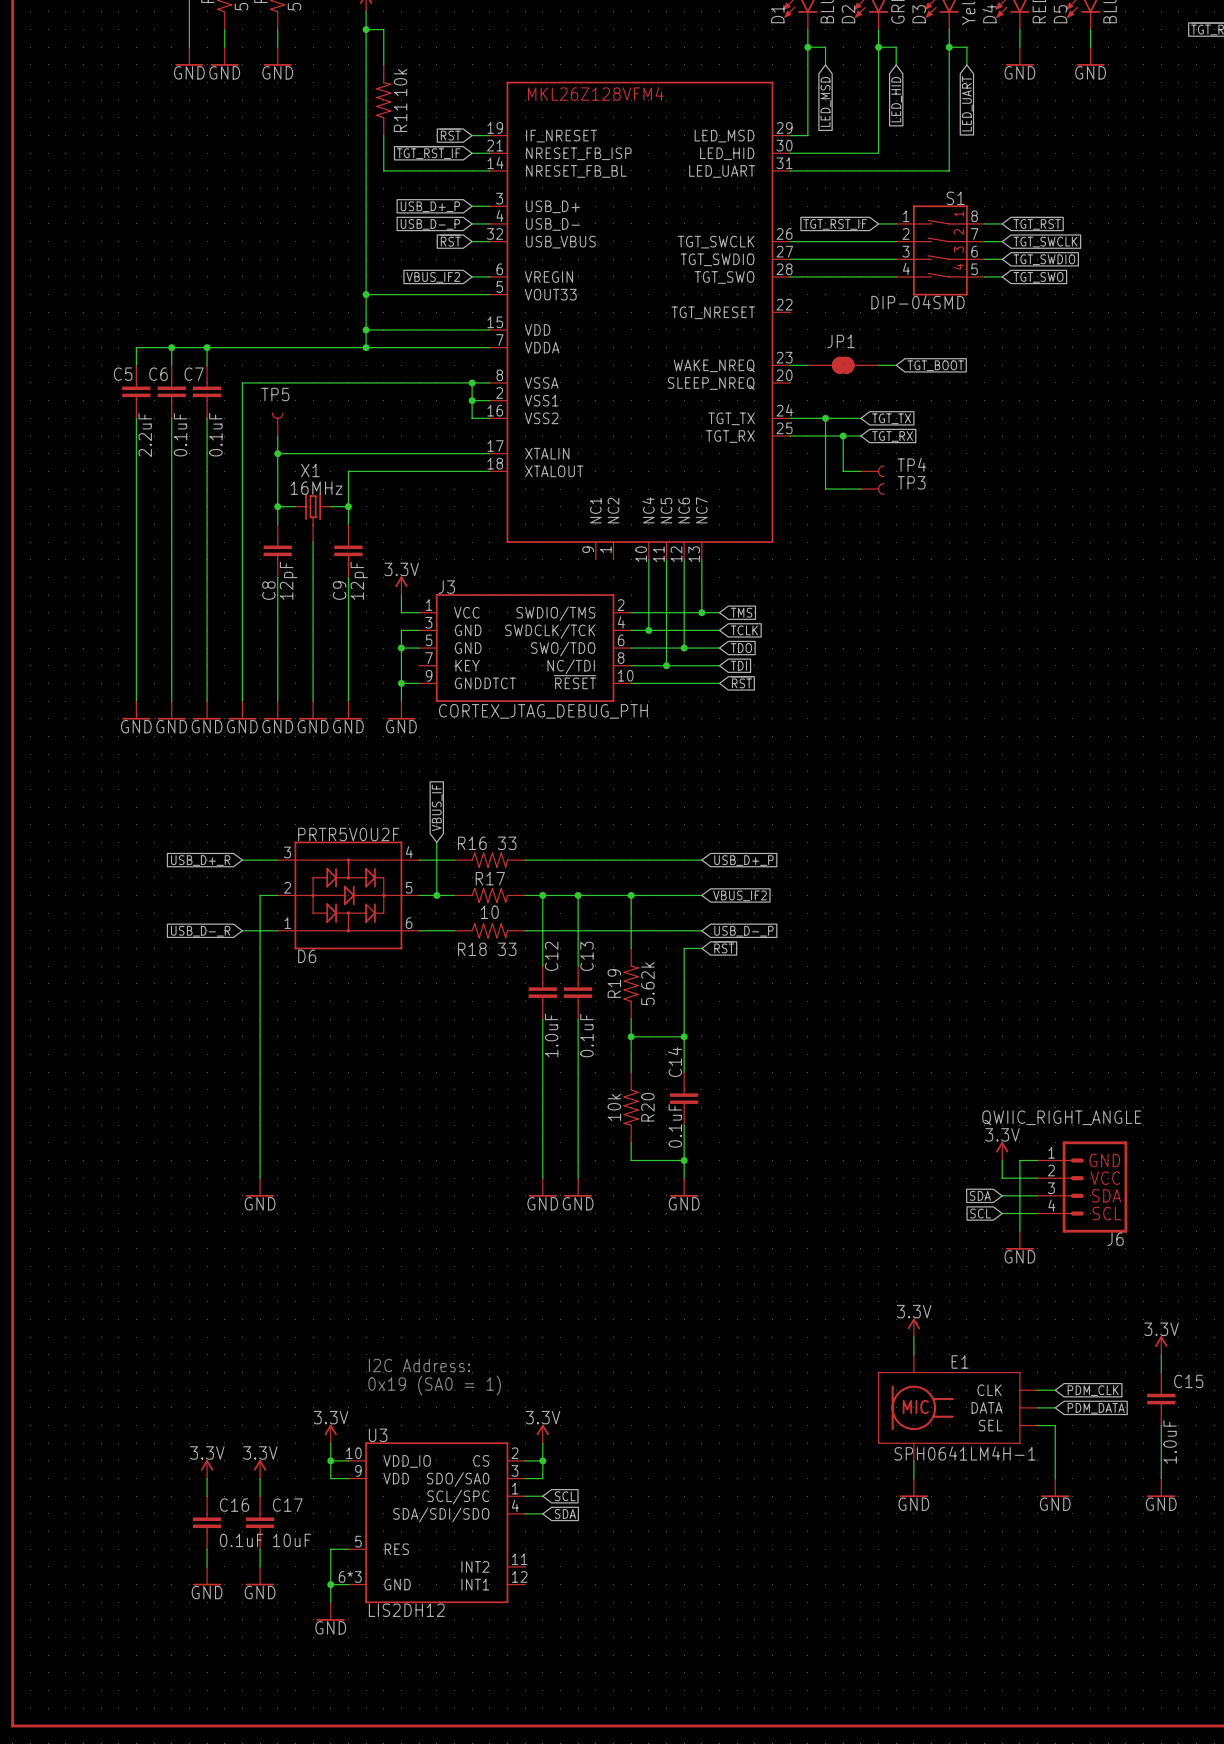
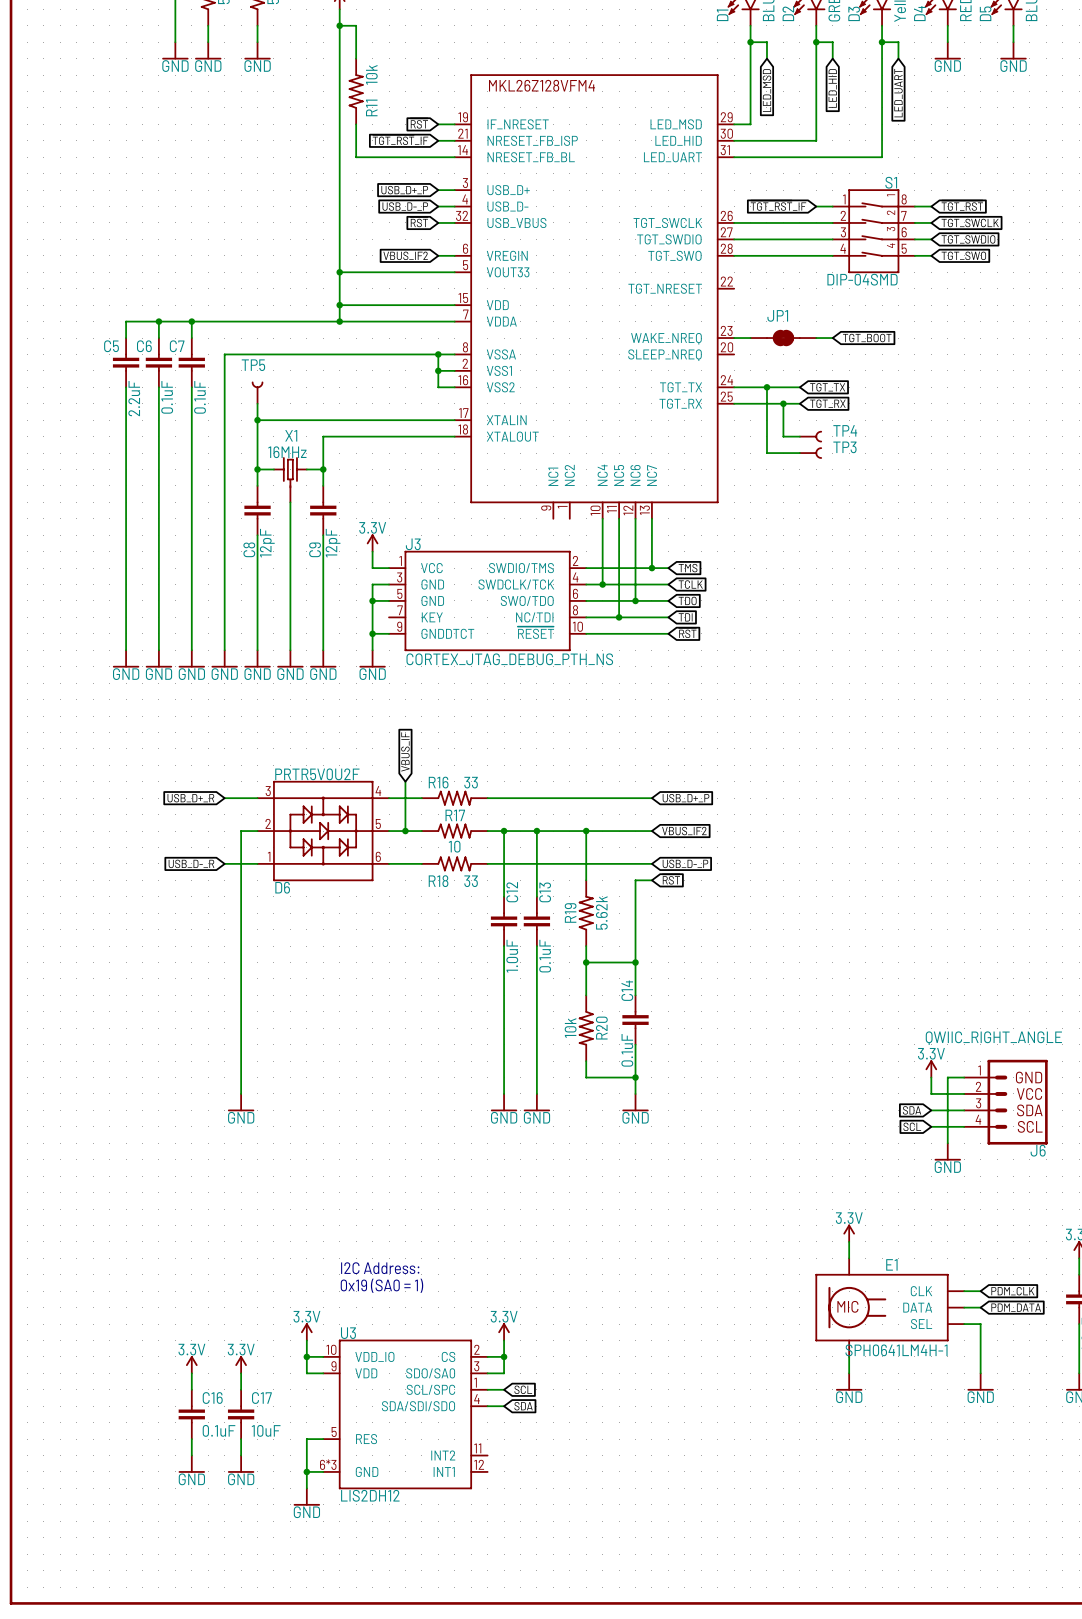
J3 value: CORTEX_JTAG_DEBUG_PTH (543, 711) -> CORTEX_JTAG_DEBUG_PTH_NS (509, 659)

